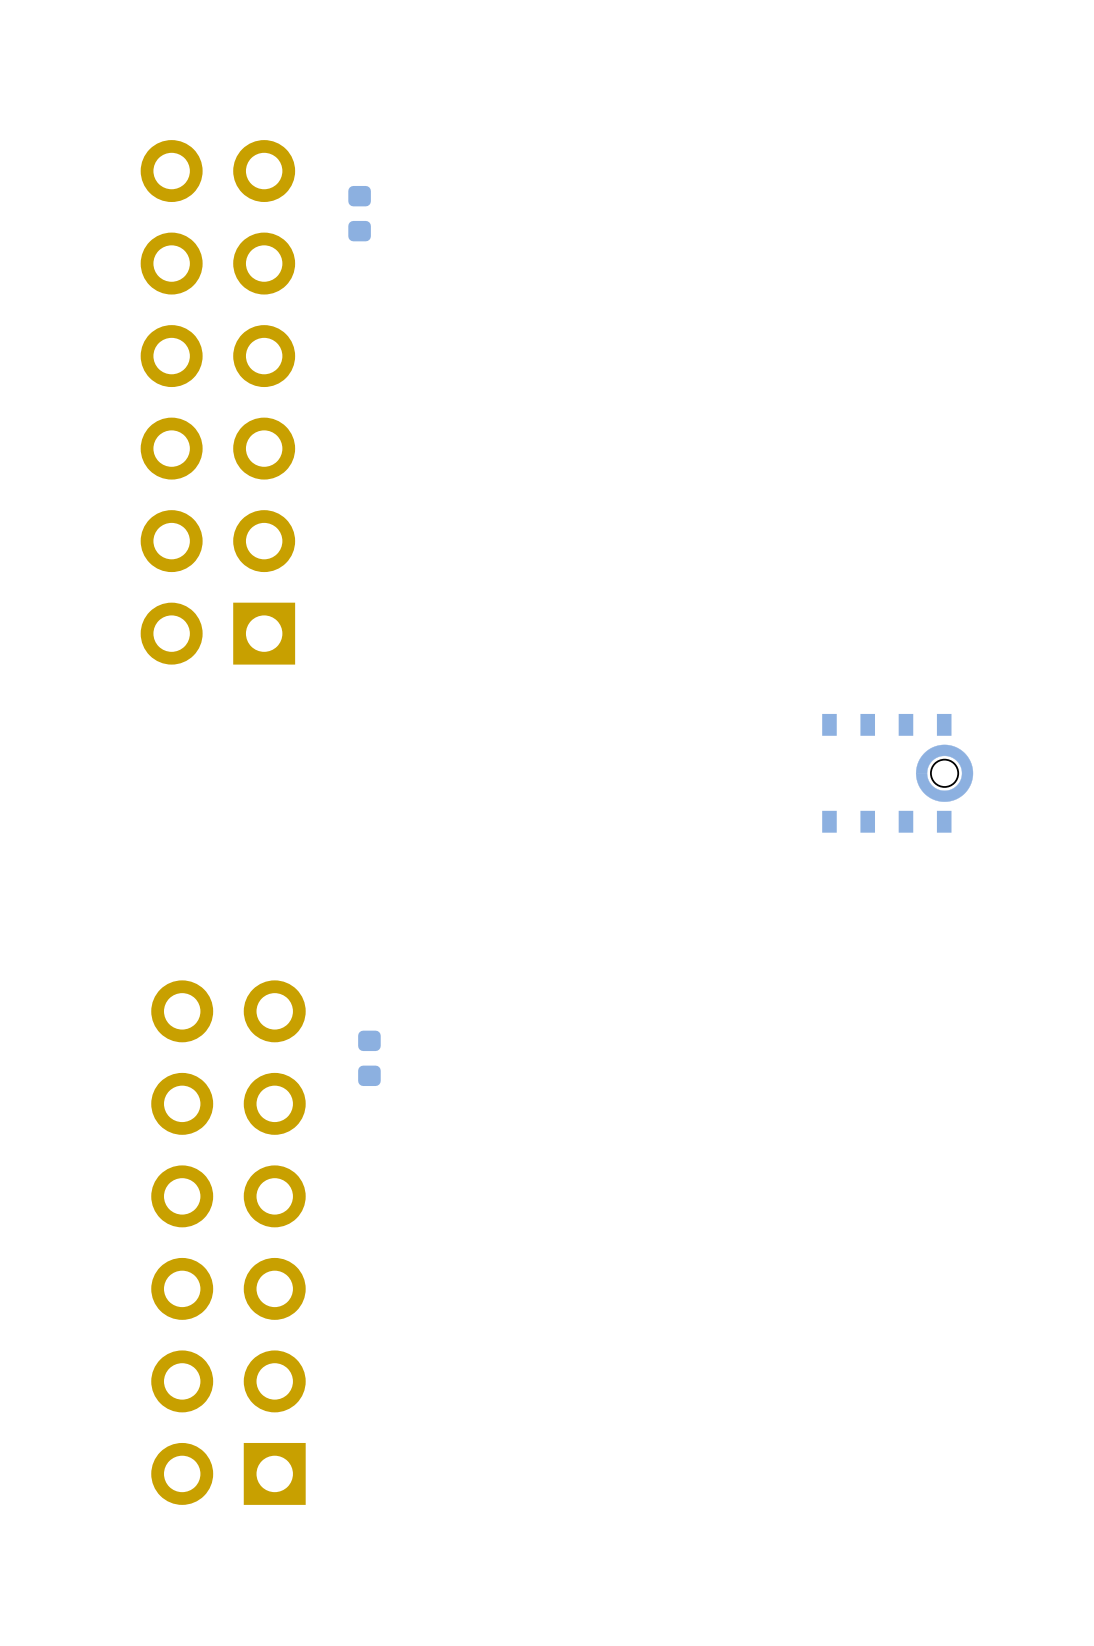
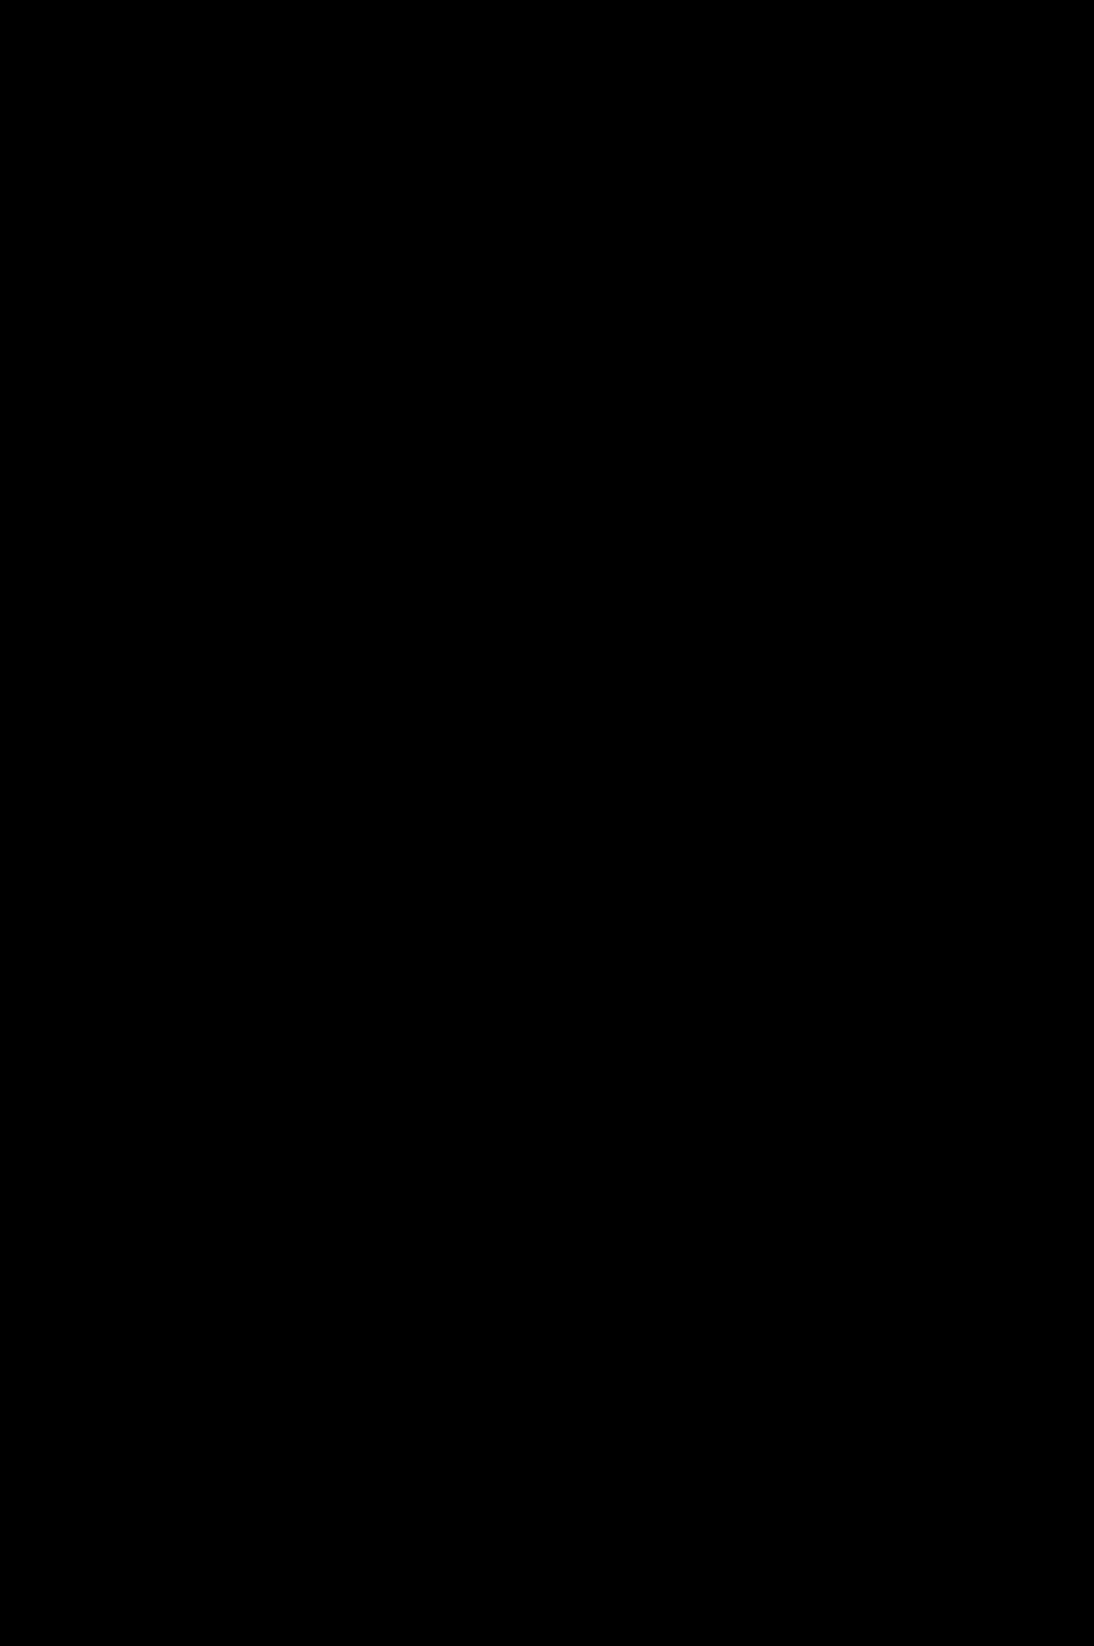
part: (359, 213) -> none
part: (217, 402) -> none
part: (897, 773) -> none
part: (369, 1058) -> none
part: (228, 1242) -> none

